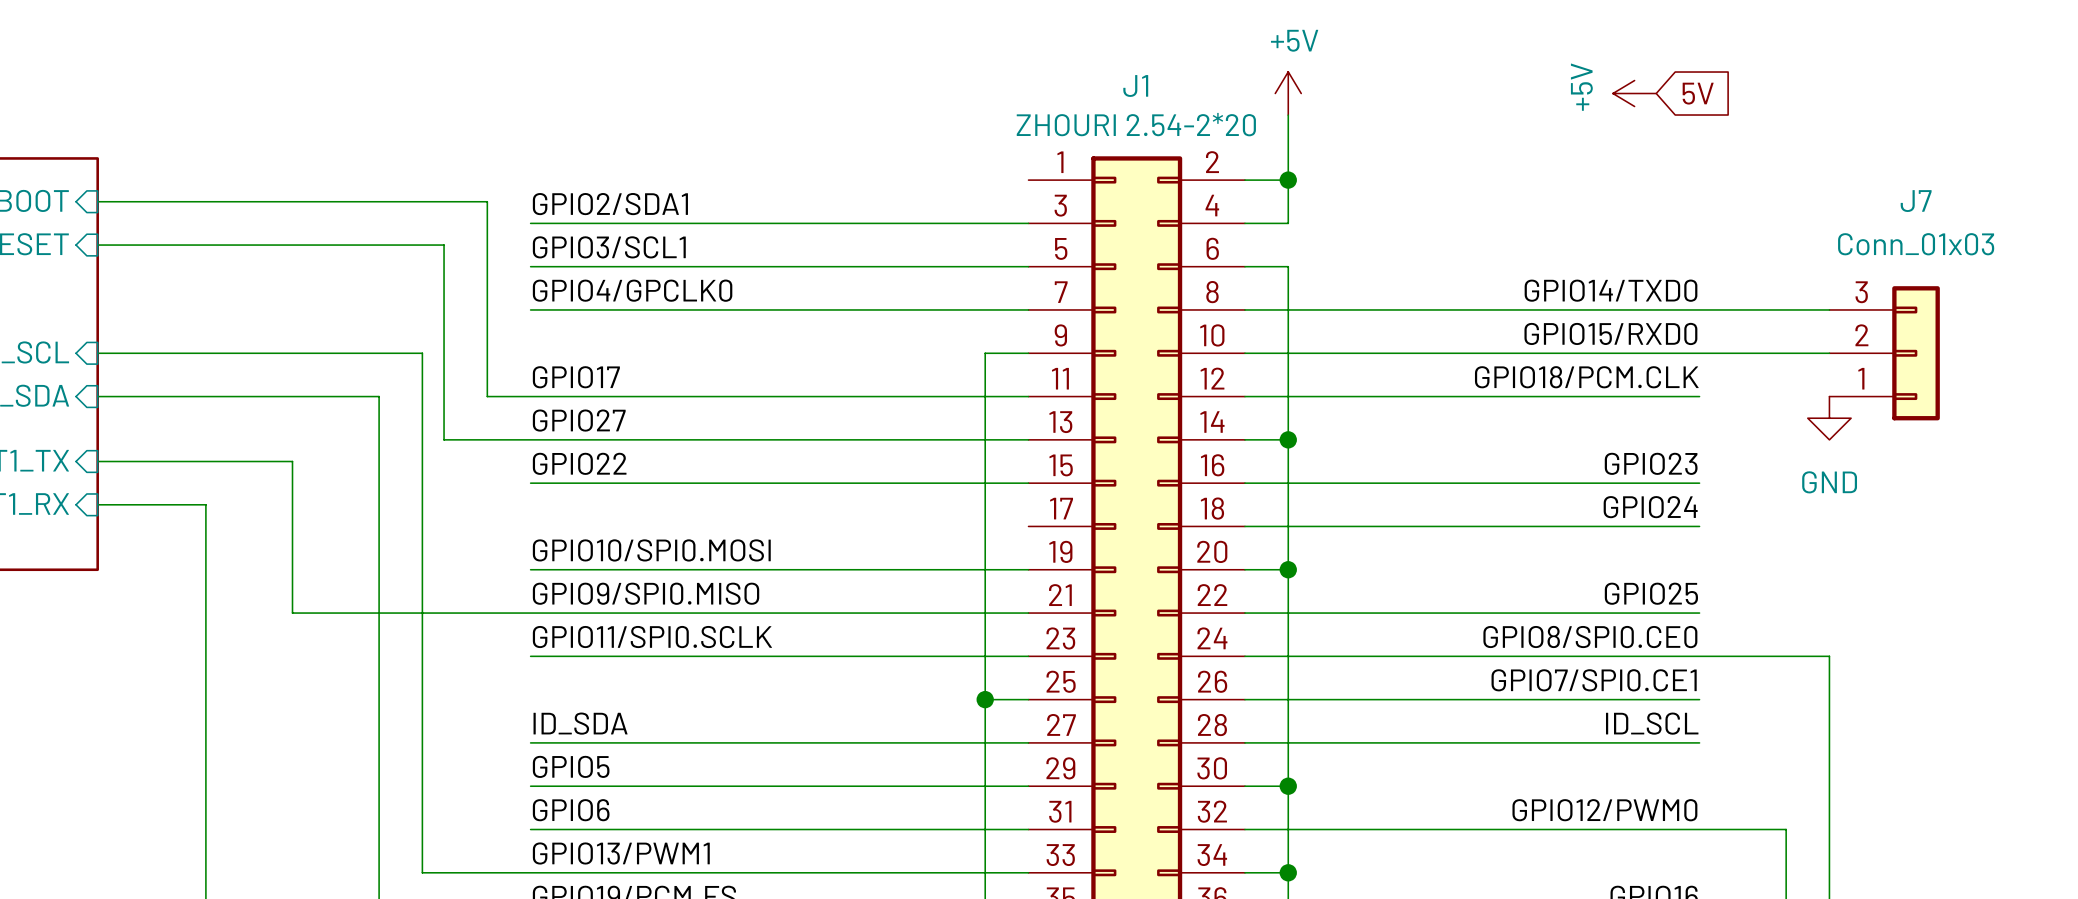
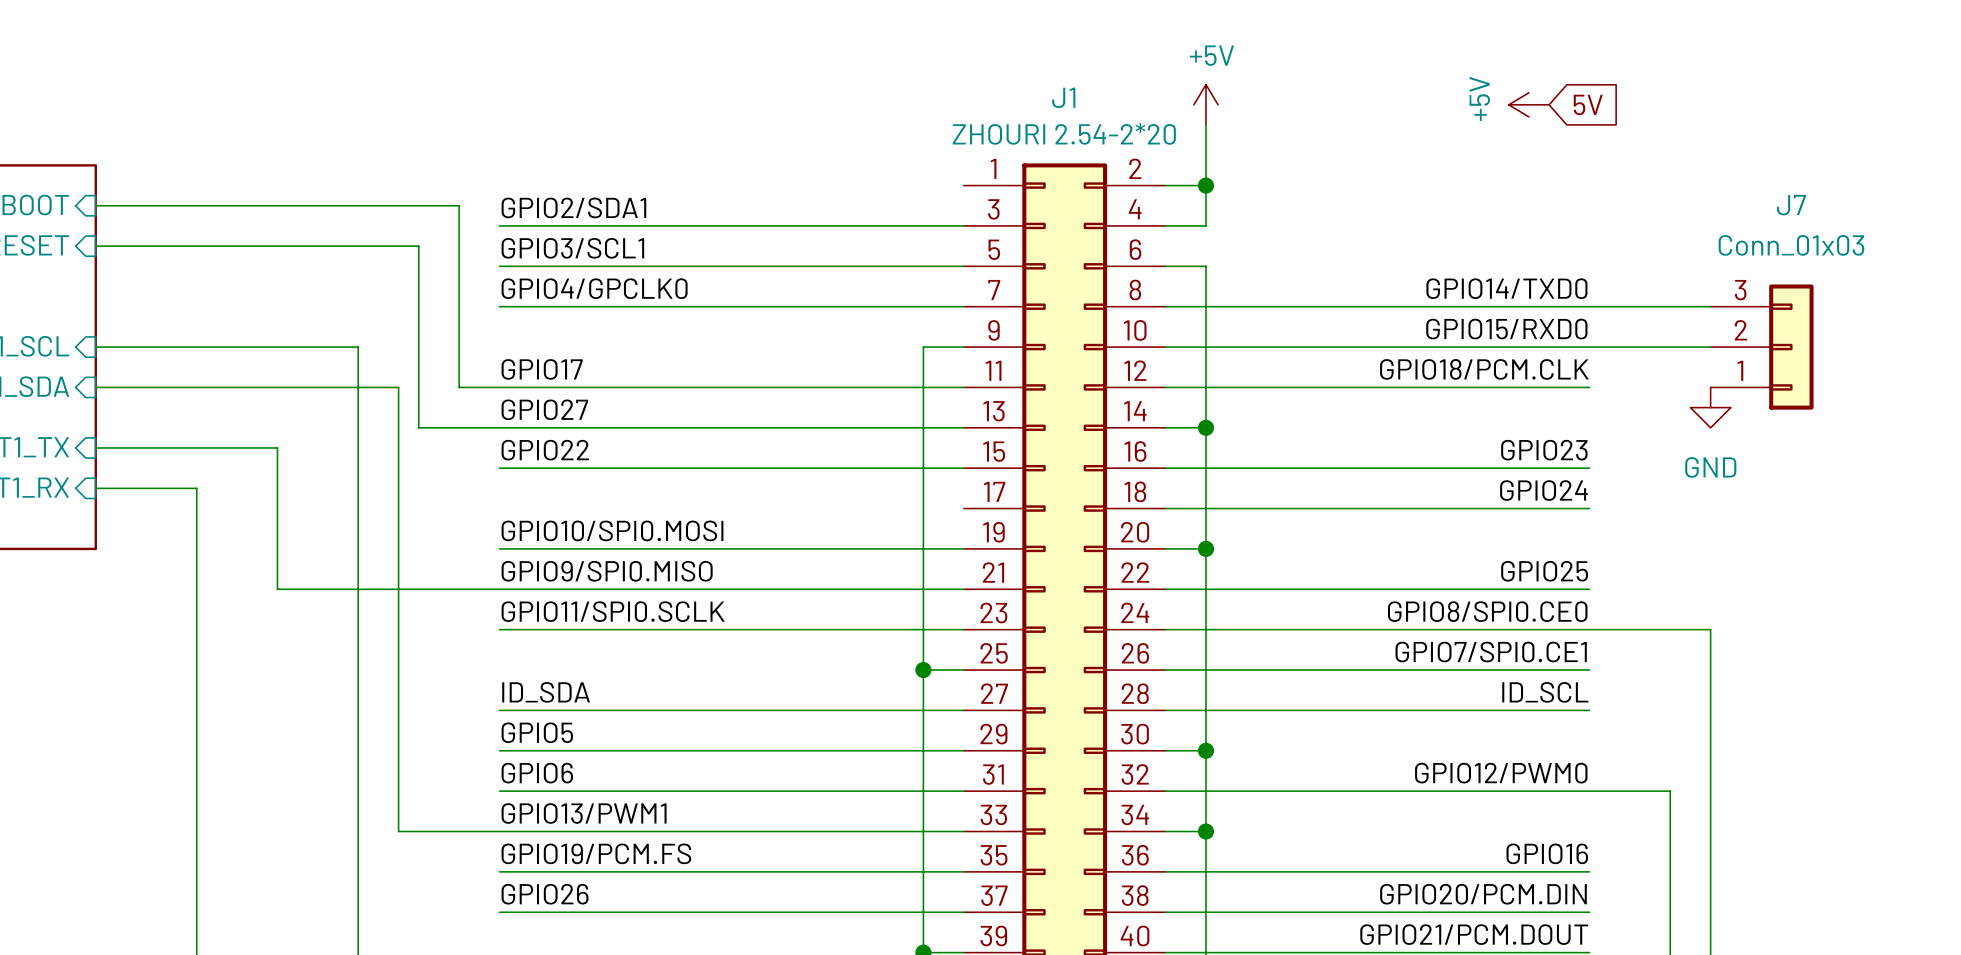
wire: (379, 353) (422, 353) (422, 396) -> (358, 347) (358, 387) (398, 387)

